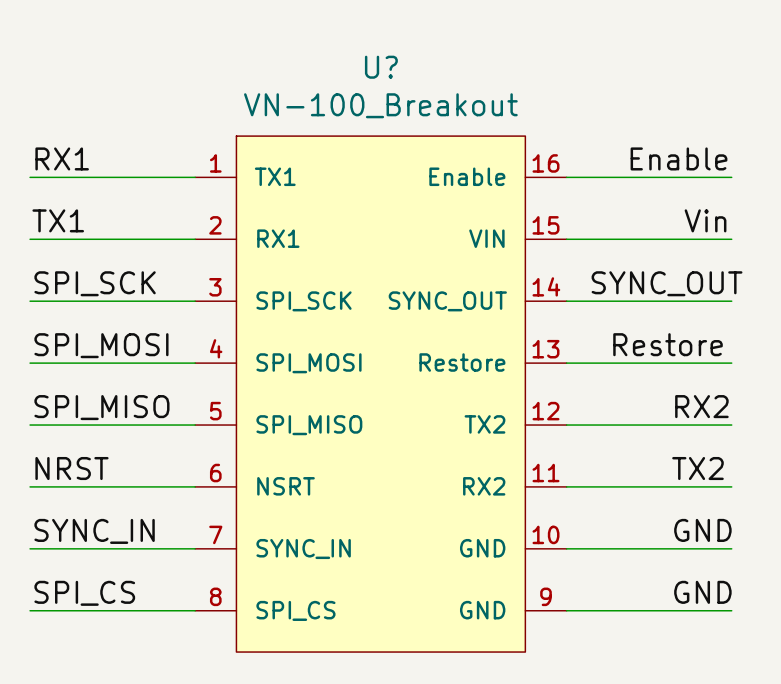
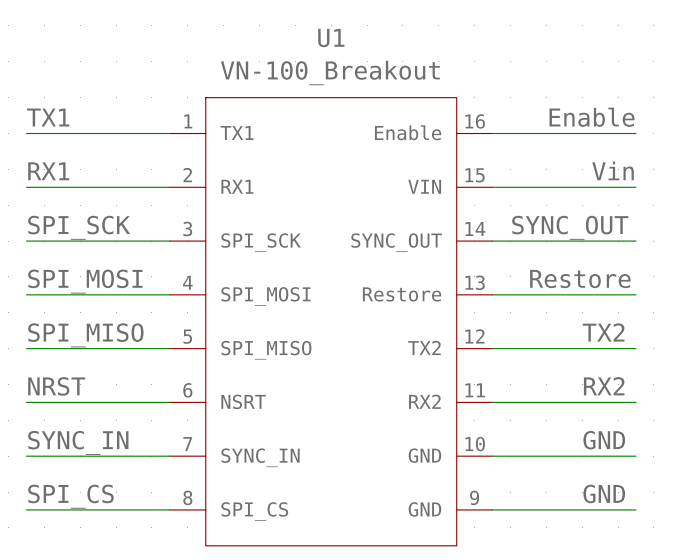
U? name: U? (381, 67) -> U1 (331, 38)
label: RX1 (62, 158) -> TX1 (48, 117)
label: TX1 (58, 220) -> RX1 (48, 171)
label: RX2 (701, 406) -> TX2 (603, 332)
label: TX2 (697, 468) -> RX2 (604, 386)

